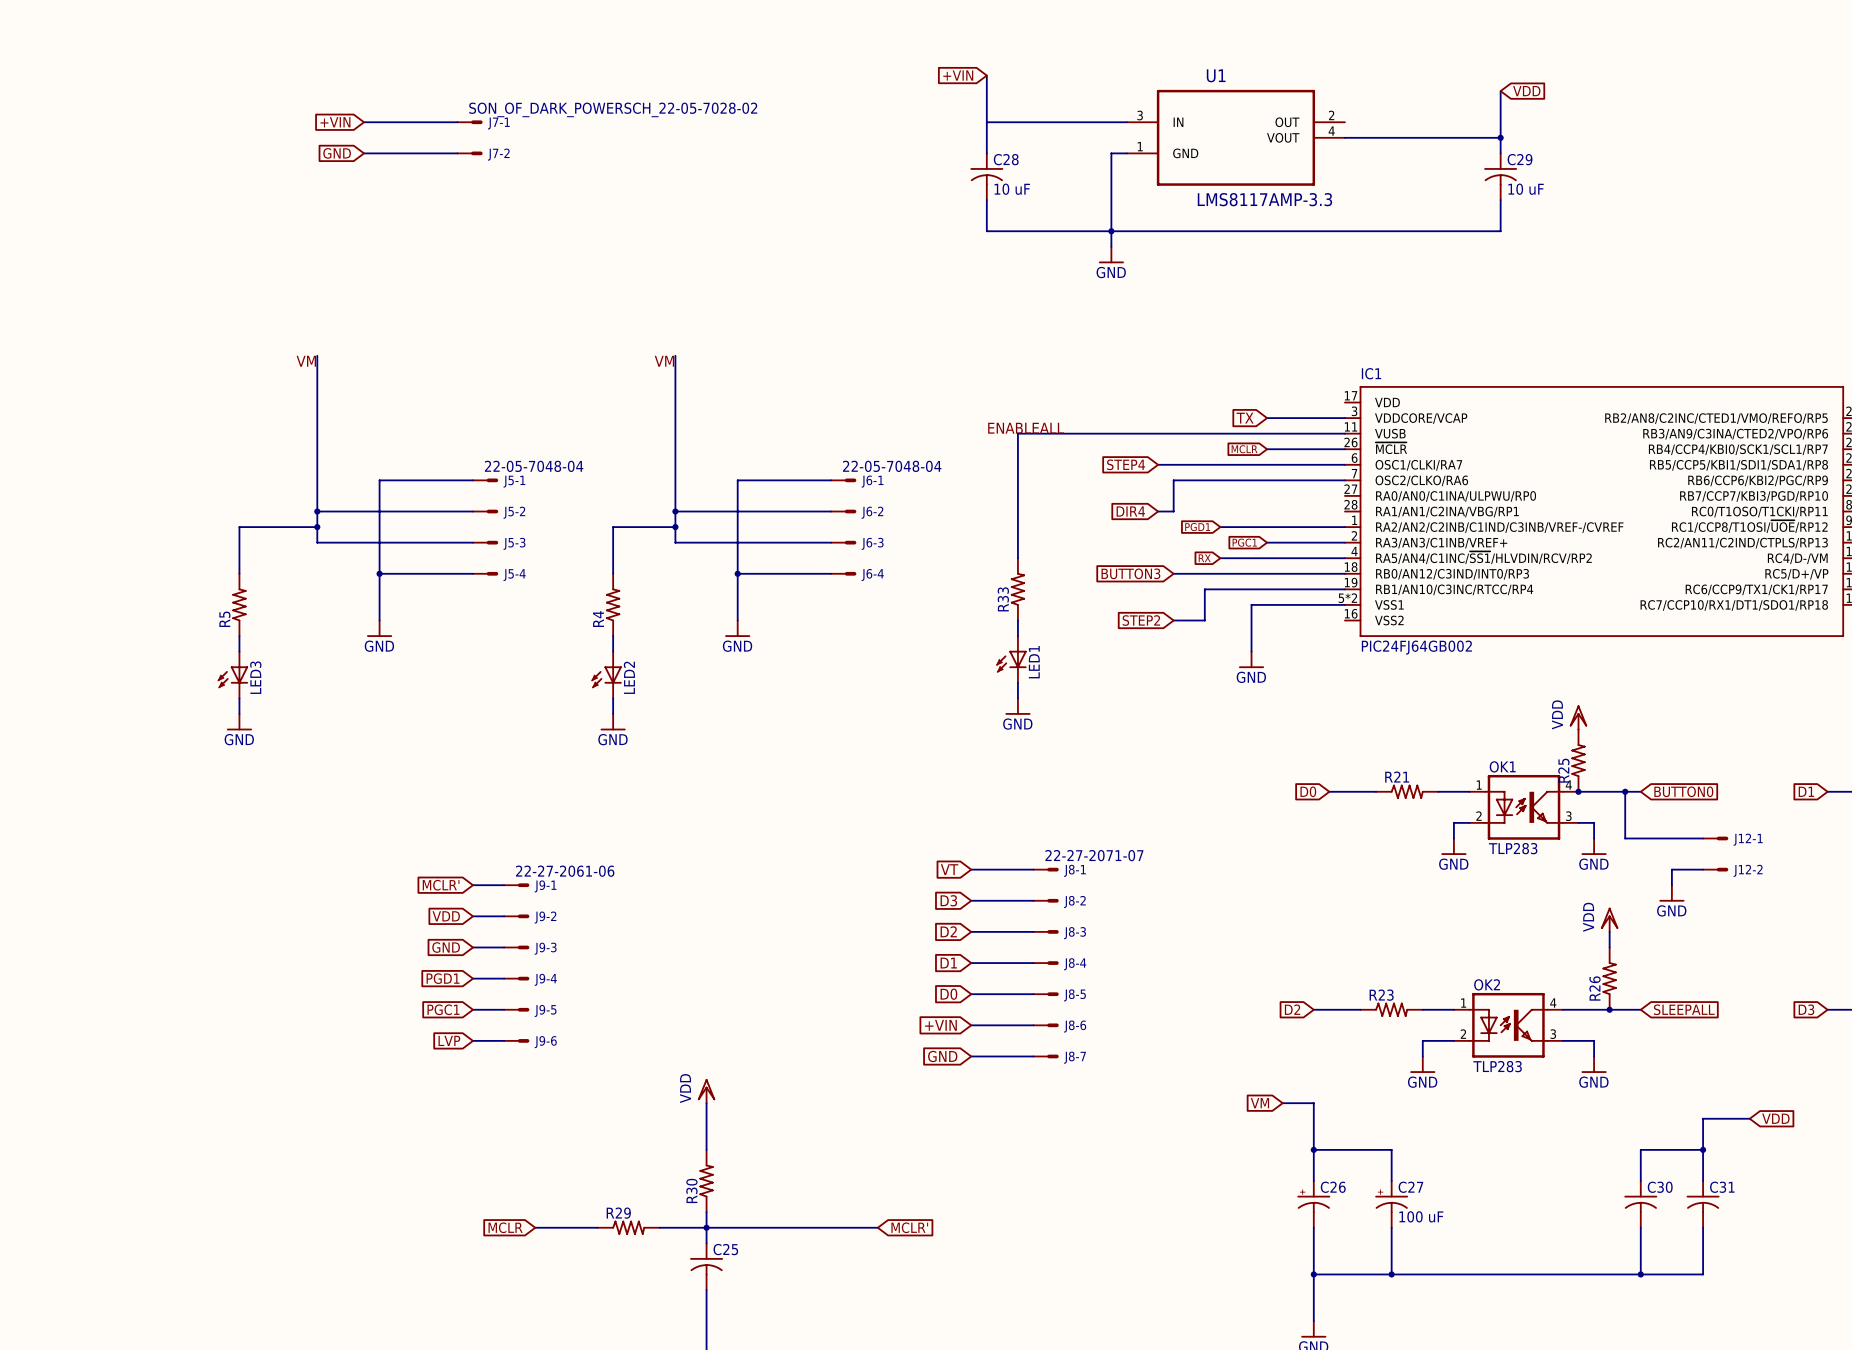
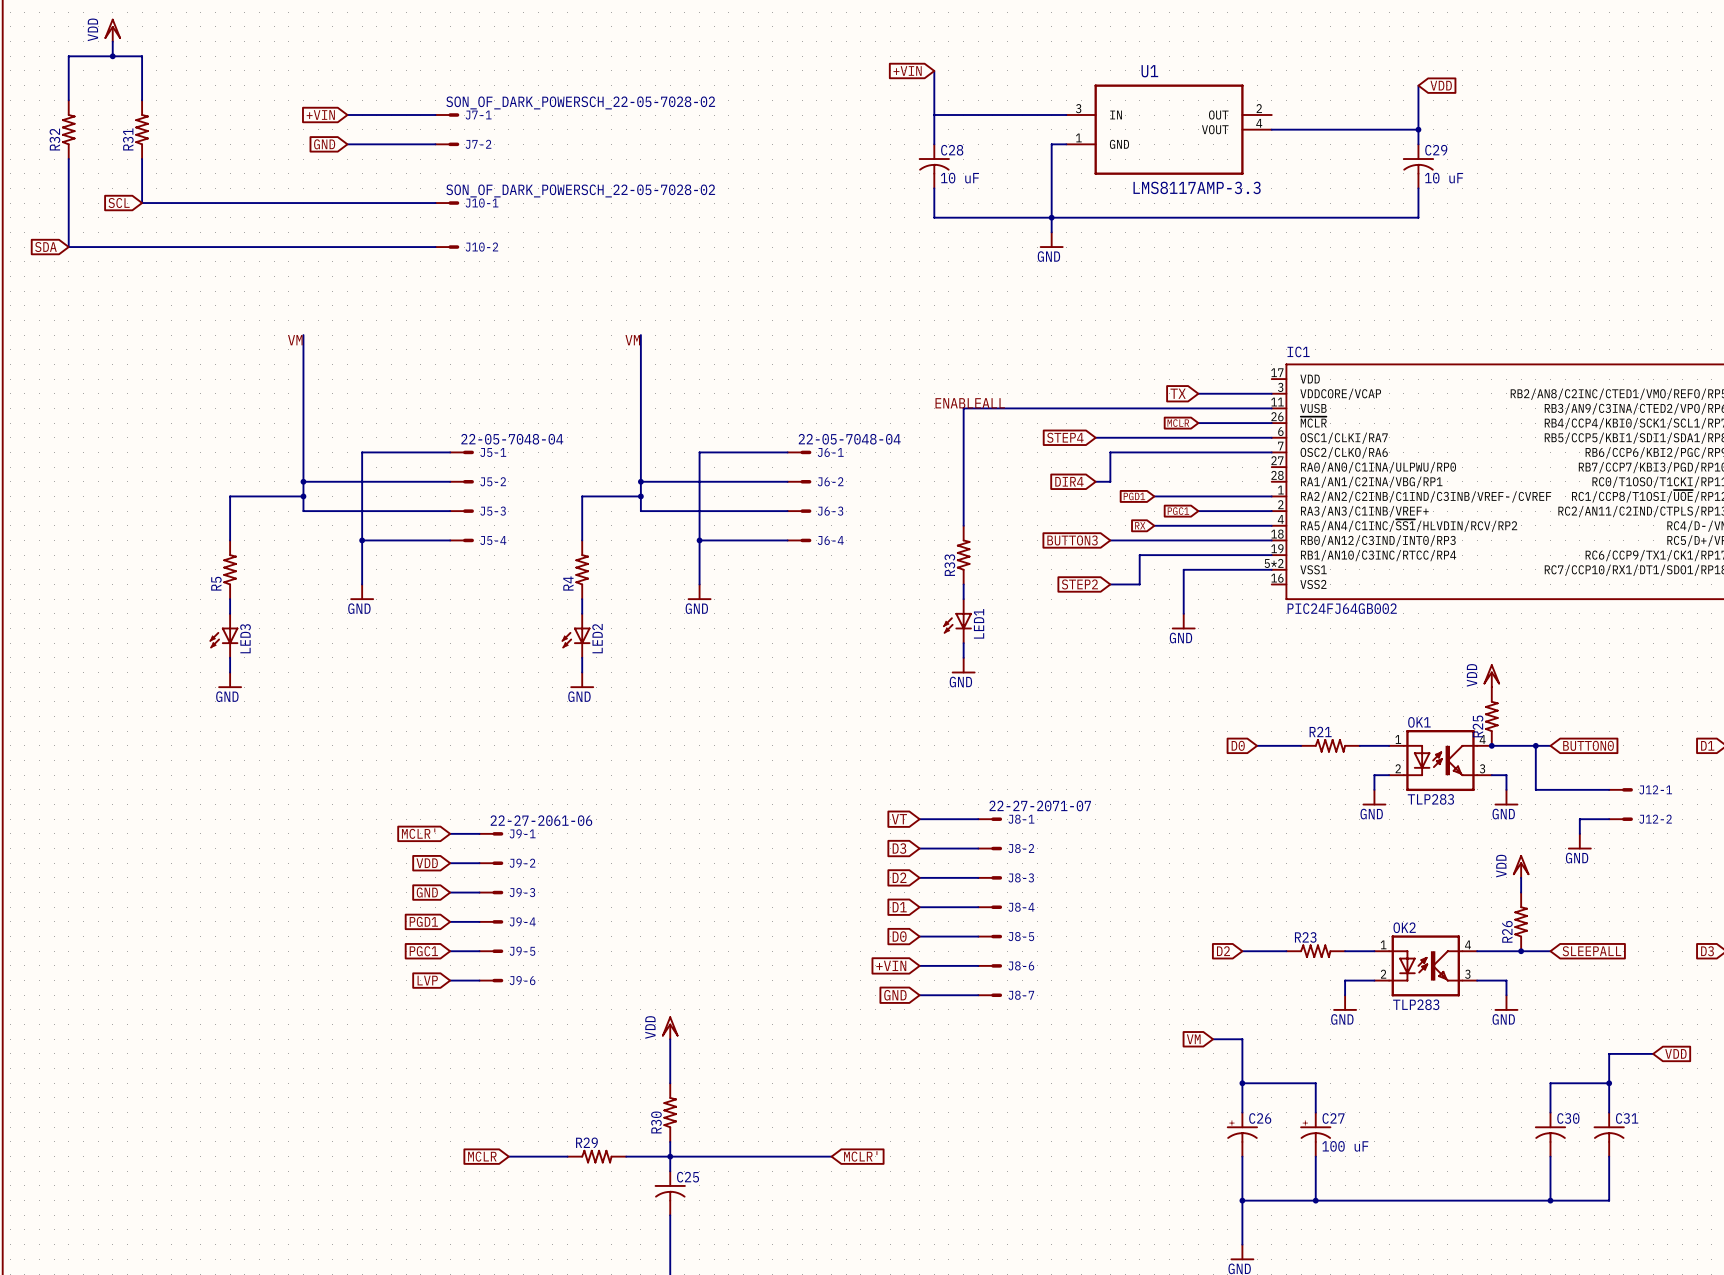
power symbol: none -> VDD (112, 30)
wire: none -> (112, 41) (112, 56)
junction: none -> (112, 56)
wire: none -> (68, 100) (68, 56) (142, 56) (142, 100)
R32: none -> (68, 129)
R31: none -> (142, 129)
wire: none -> (68, 159) (68, 247) (435, 247)
wire: none -> (142, 159) (142, 203) (435, 203)
global label: none -> SCL (119, 203)
J10-1: none -> SON_OF_DARK_POWERSCH_22-05-7028-02 (447, 203)
global label: none -> SDA (45, 247)
J10-2: none -> (447, 247)

